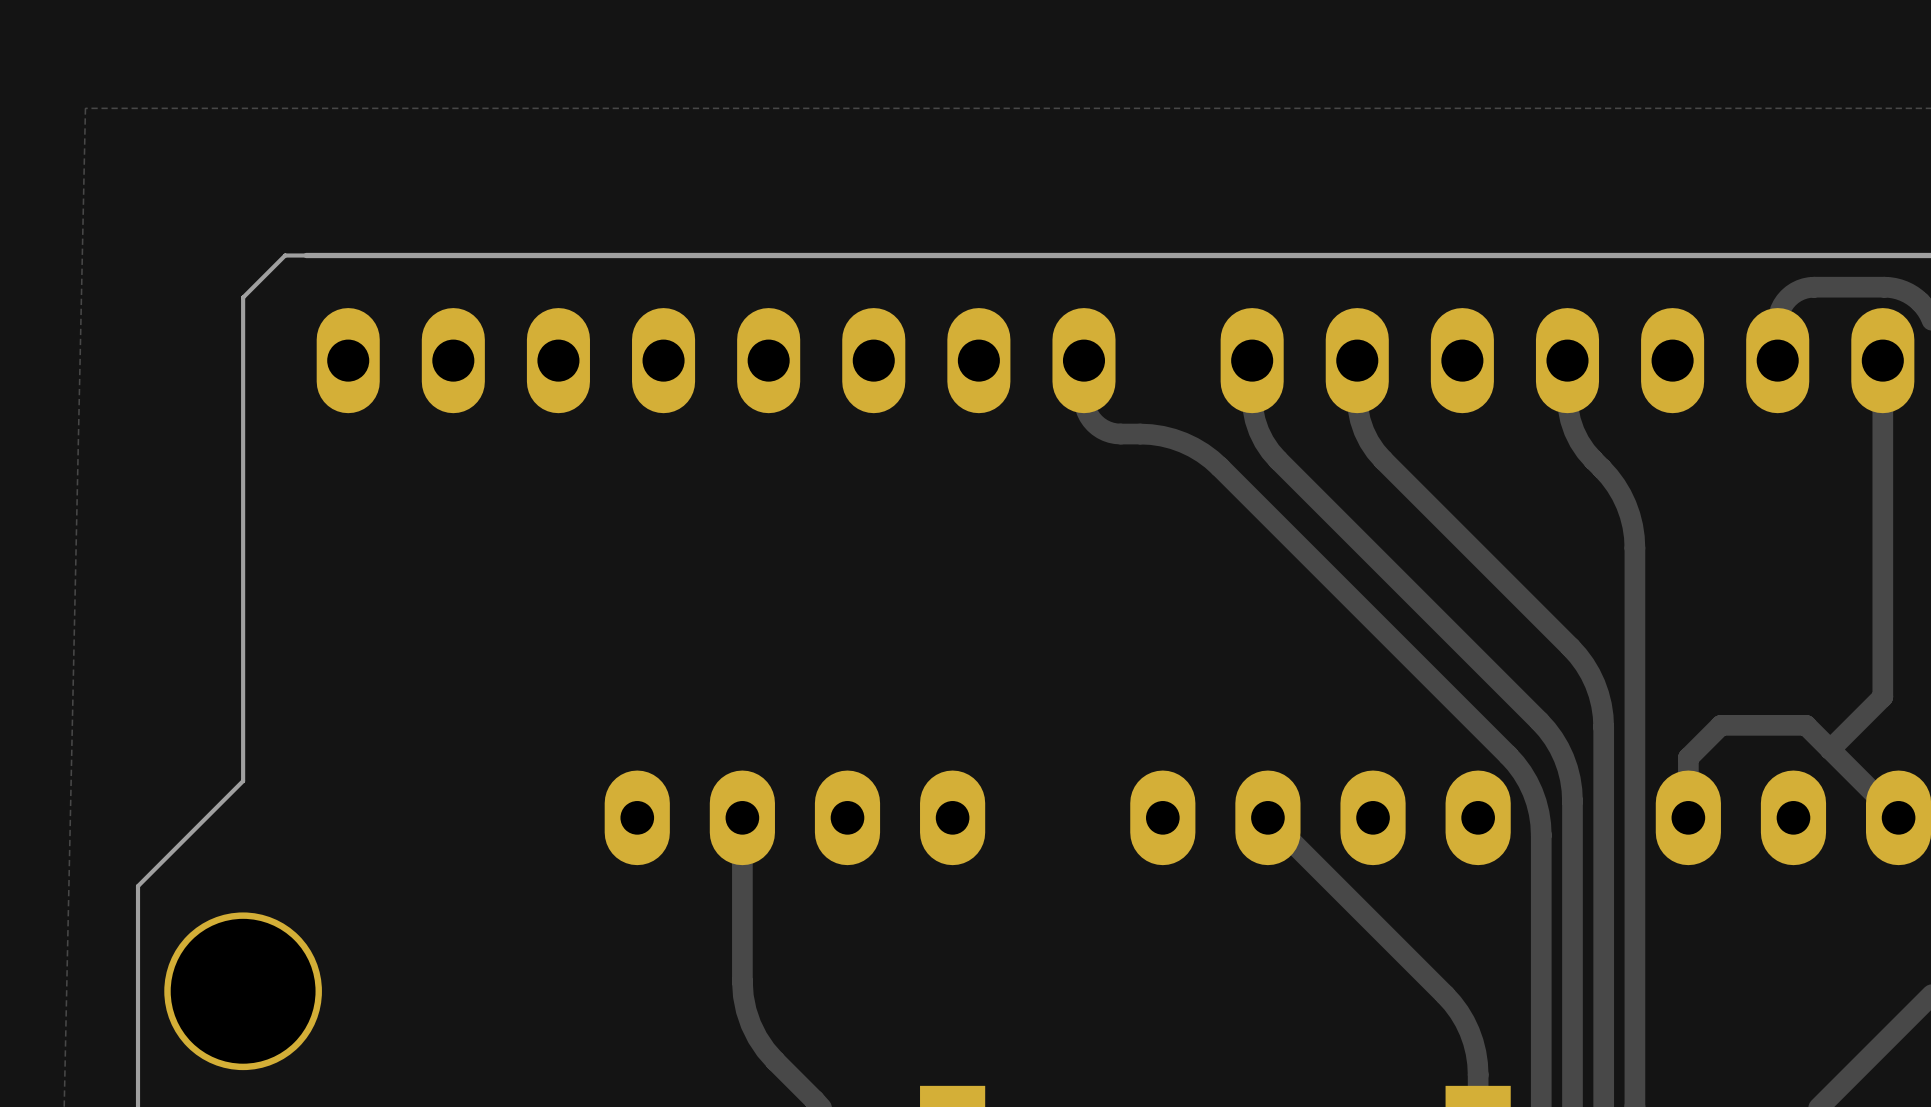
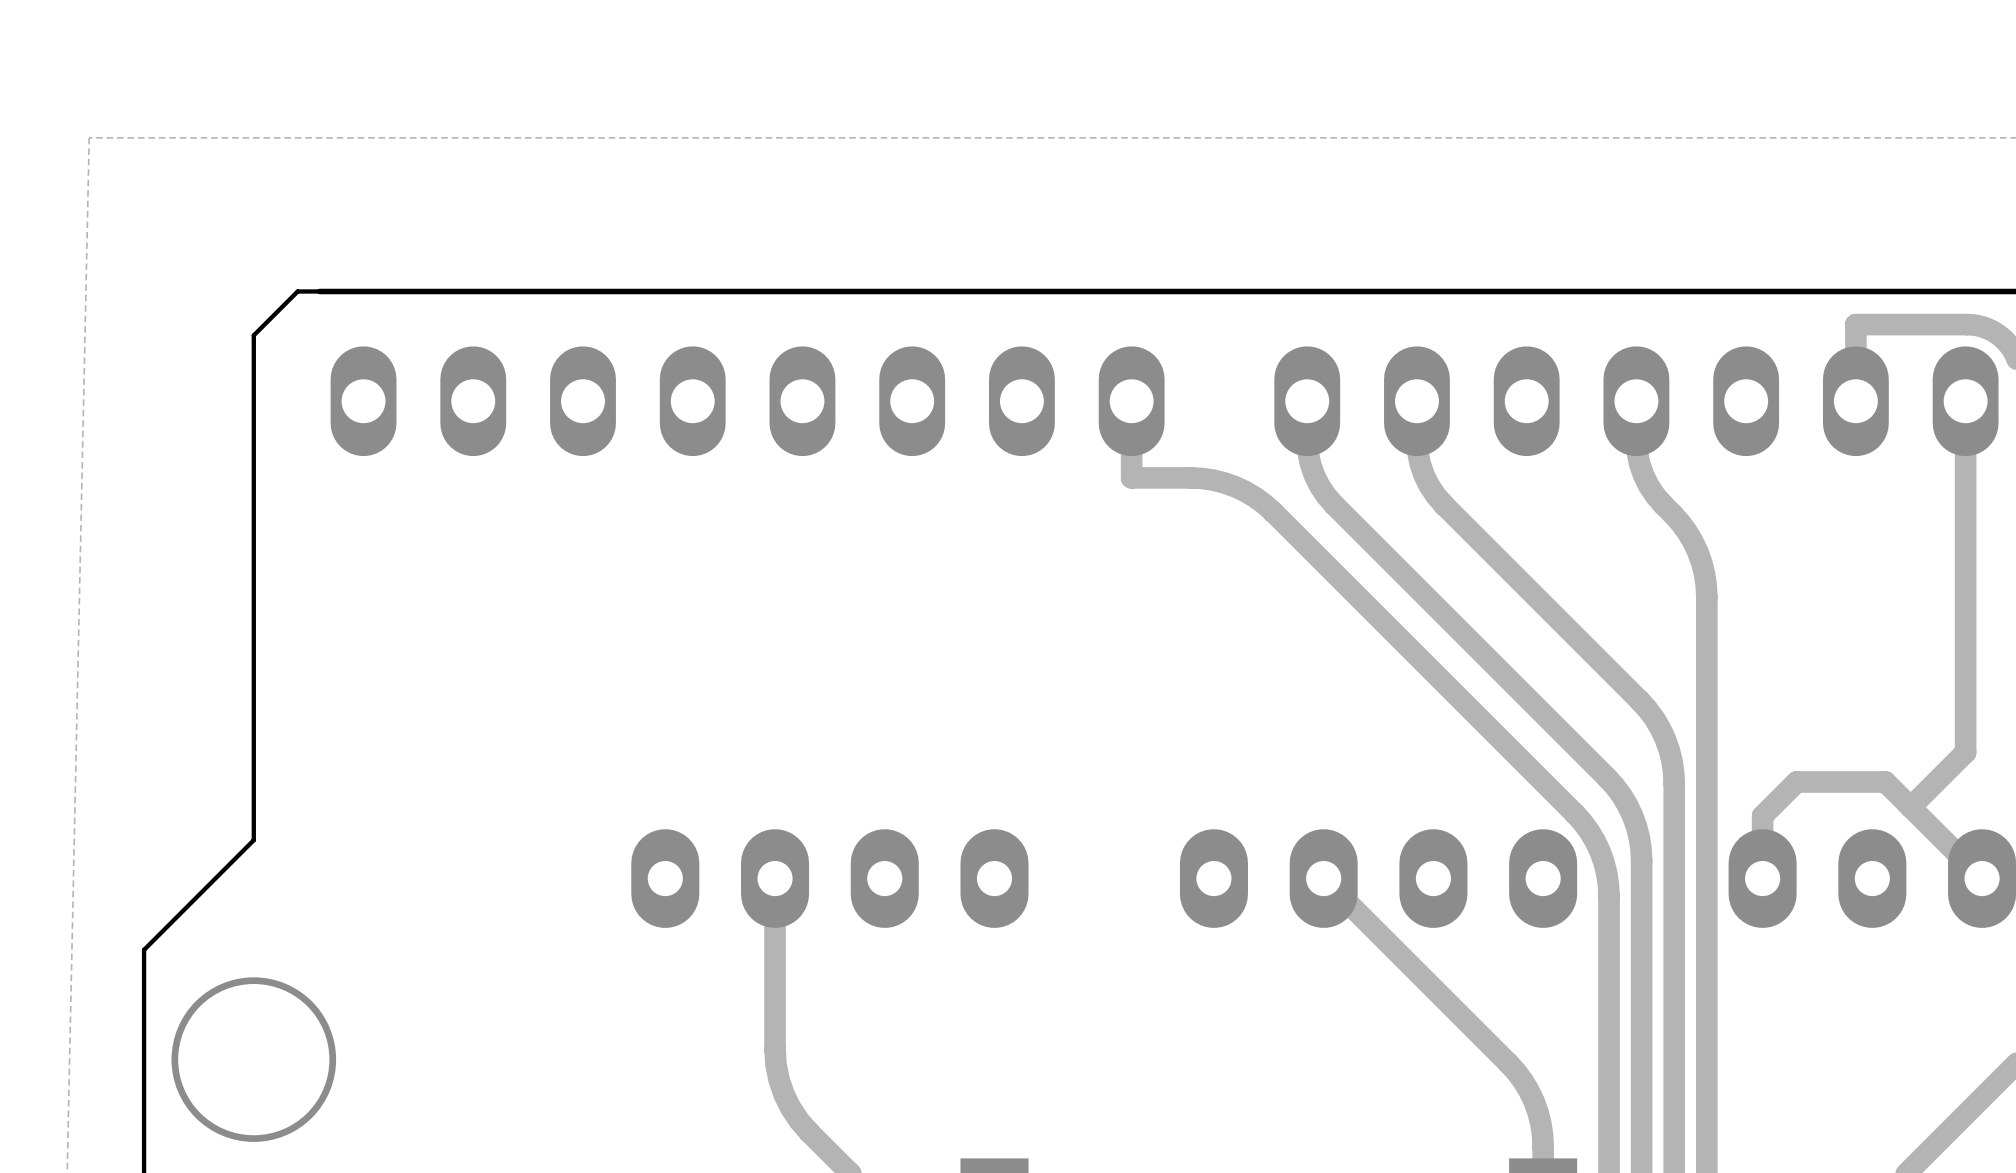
track: (1814, 287) (1800, 289) (1788, 297) (1780, 309) (1777, 323) -> (1894, 324) (1855, 324) (1855, 362)
track: (1083, 397) (1086, 411) (1094, 423) (1106, 431) (1120, 434) -> (1131, 439) (1131, 477) (1169, 477)

